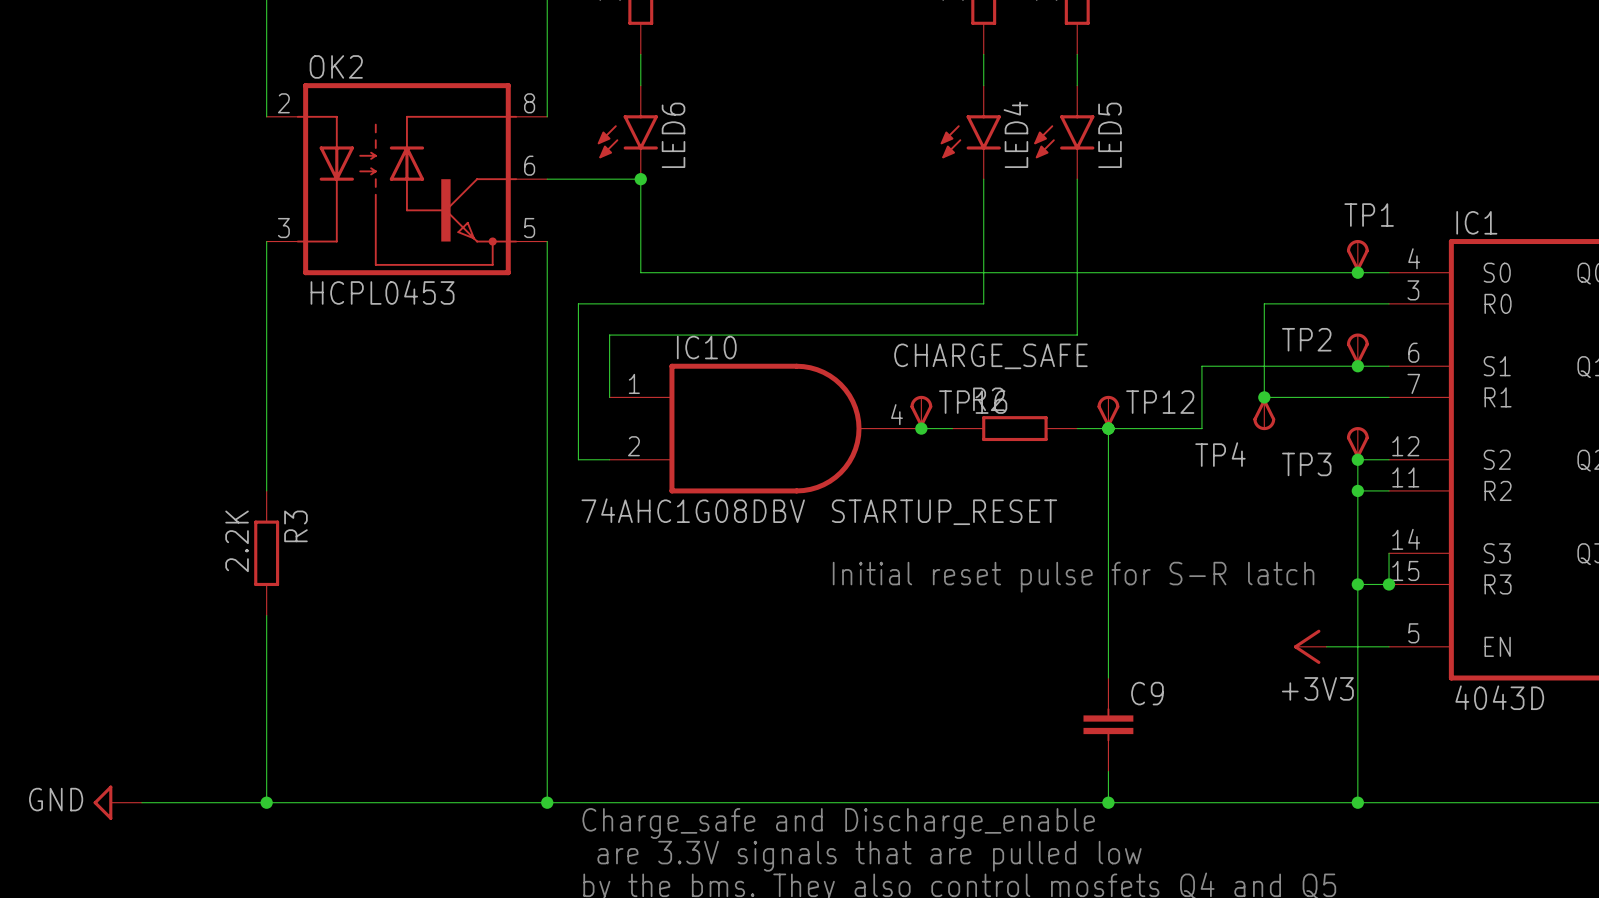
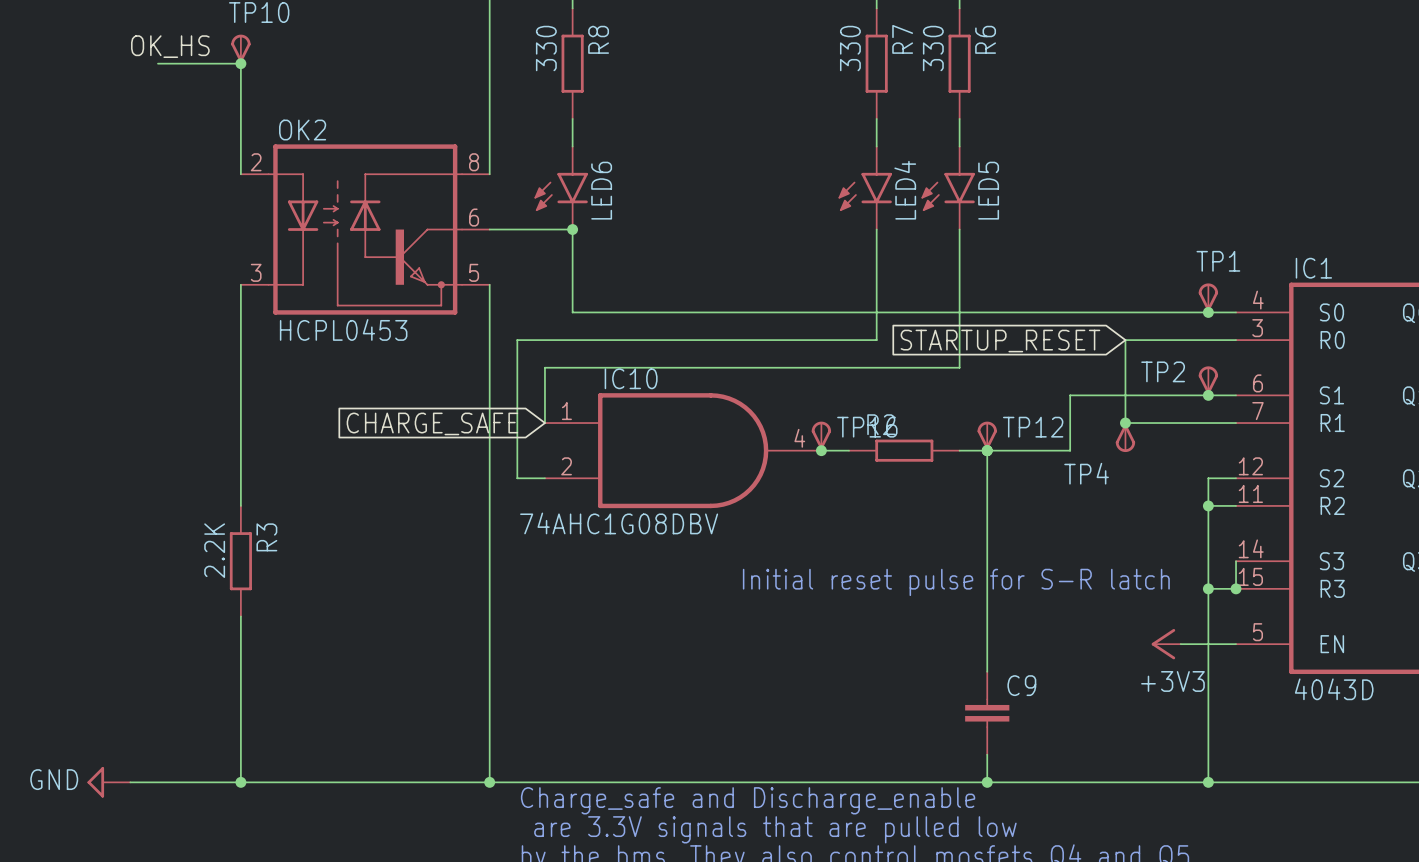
global label: none -> STARTUP_RESET (1000, 341)
label: CHARGE_SAFE (990, 356) -> none
global label: none -> CHARGE_SAFE (432, 423)
TP3: (1357, 443) -> none
junction: (1357, 459) -> none
label: STARTUP_RESET (944, 512) -> none

